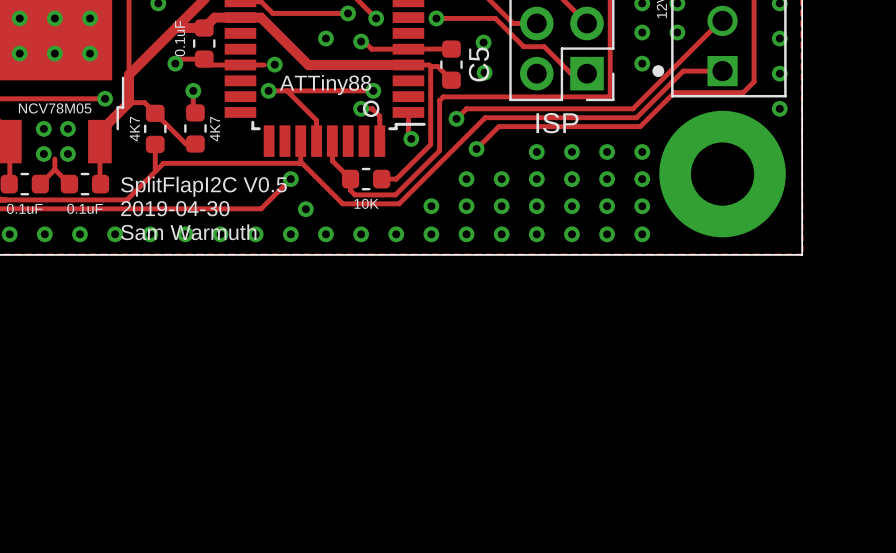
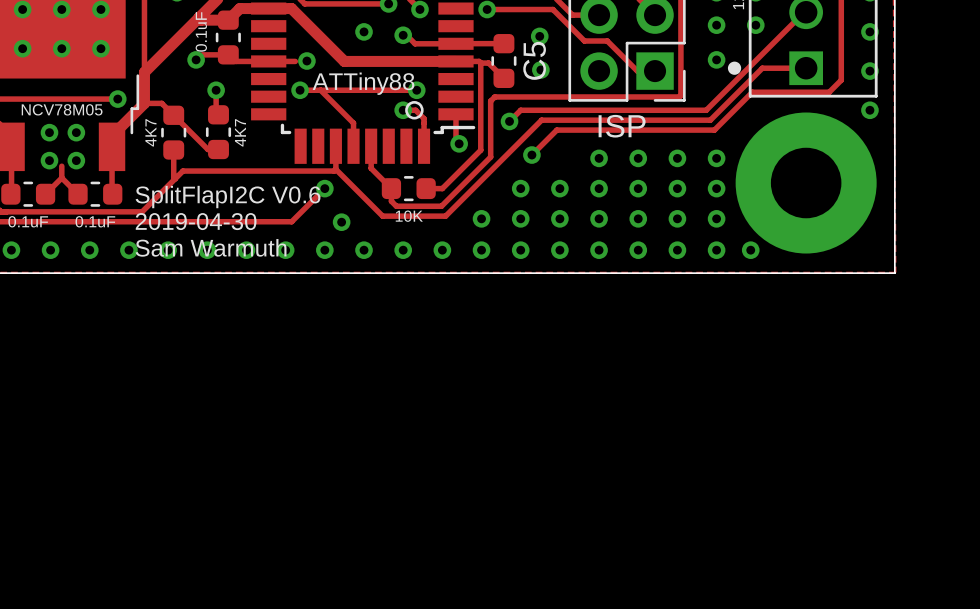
text: SplitFlapI2C V0.5 (204, 186) -> SplitFlapI2C V0.6 (228, 197)
via: none -> (750, 250)

